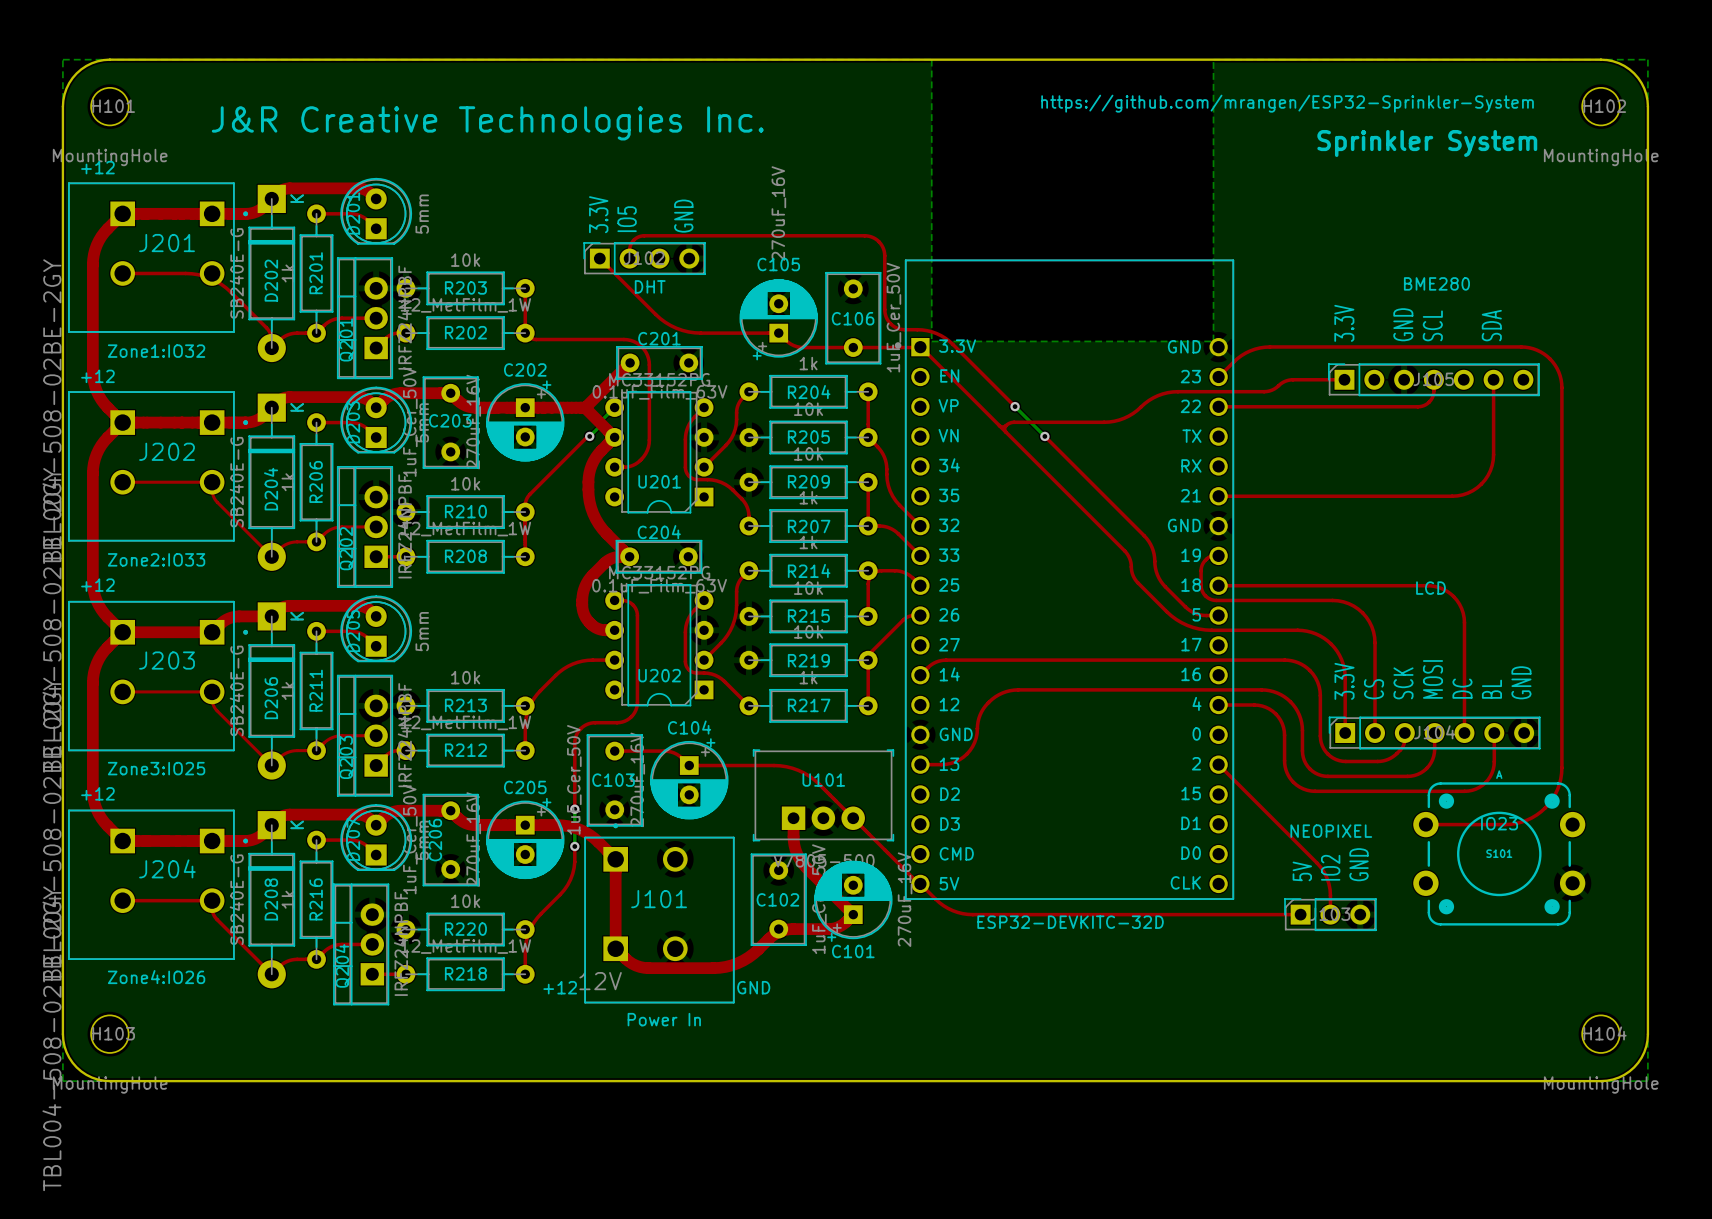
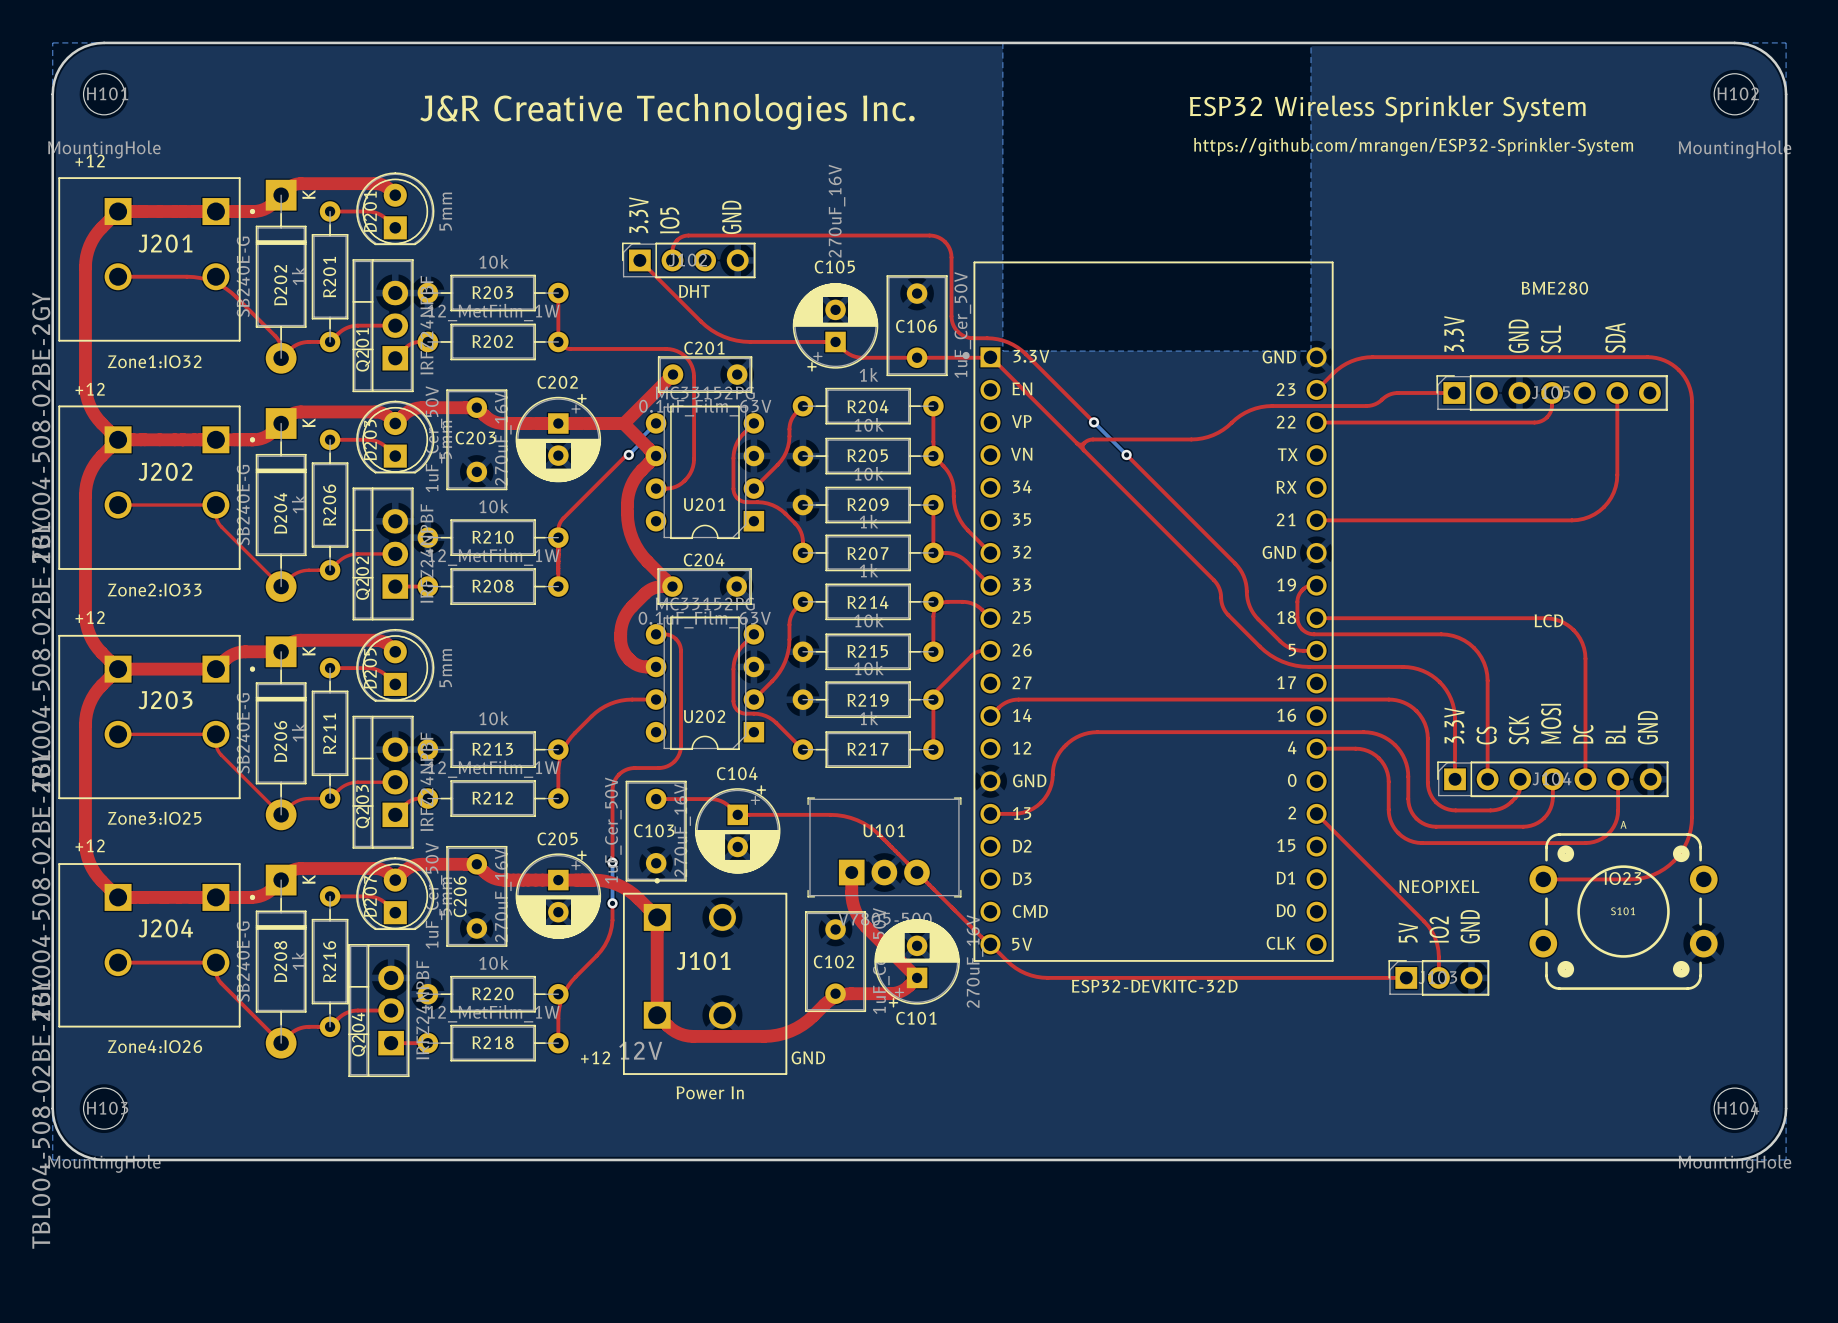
text position: https://github.com/mrangen/ESP32-Sprinkler-System (1287, 103) -> https://github.com/mrangen/ESP32-Sprinkler-System (1413, 146)
text position: J&R Creative Technologies Inc. (487, 123) -> J&R Creative Technologies Inc. (667, 111)
text: Sprinkler System (1427, 143) -> ESP32 Wireless Sprinkler System (1387, 108)

